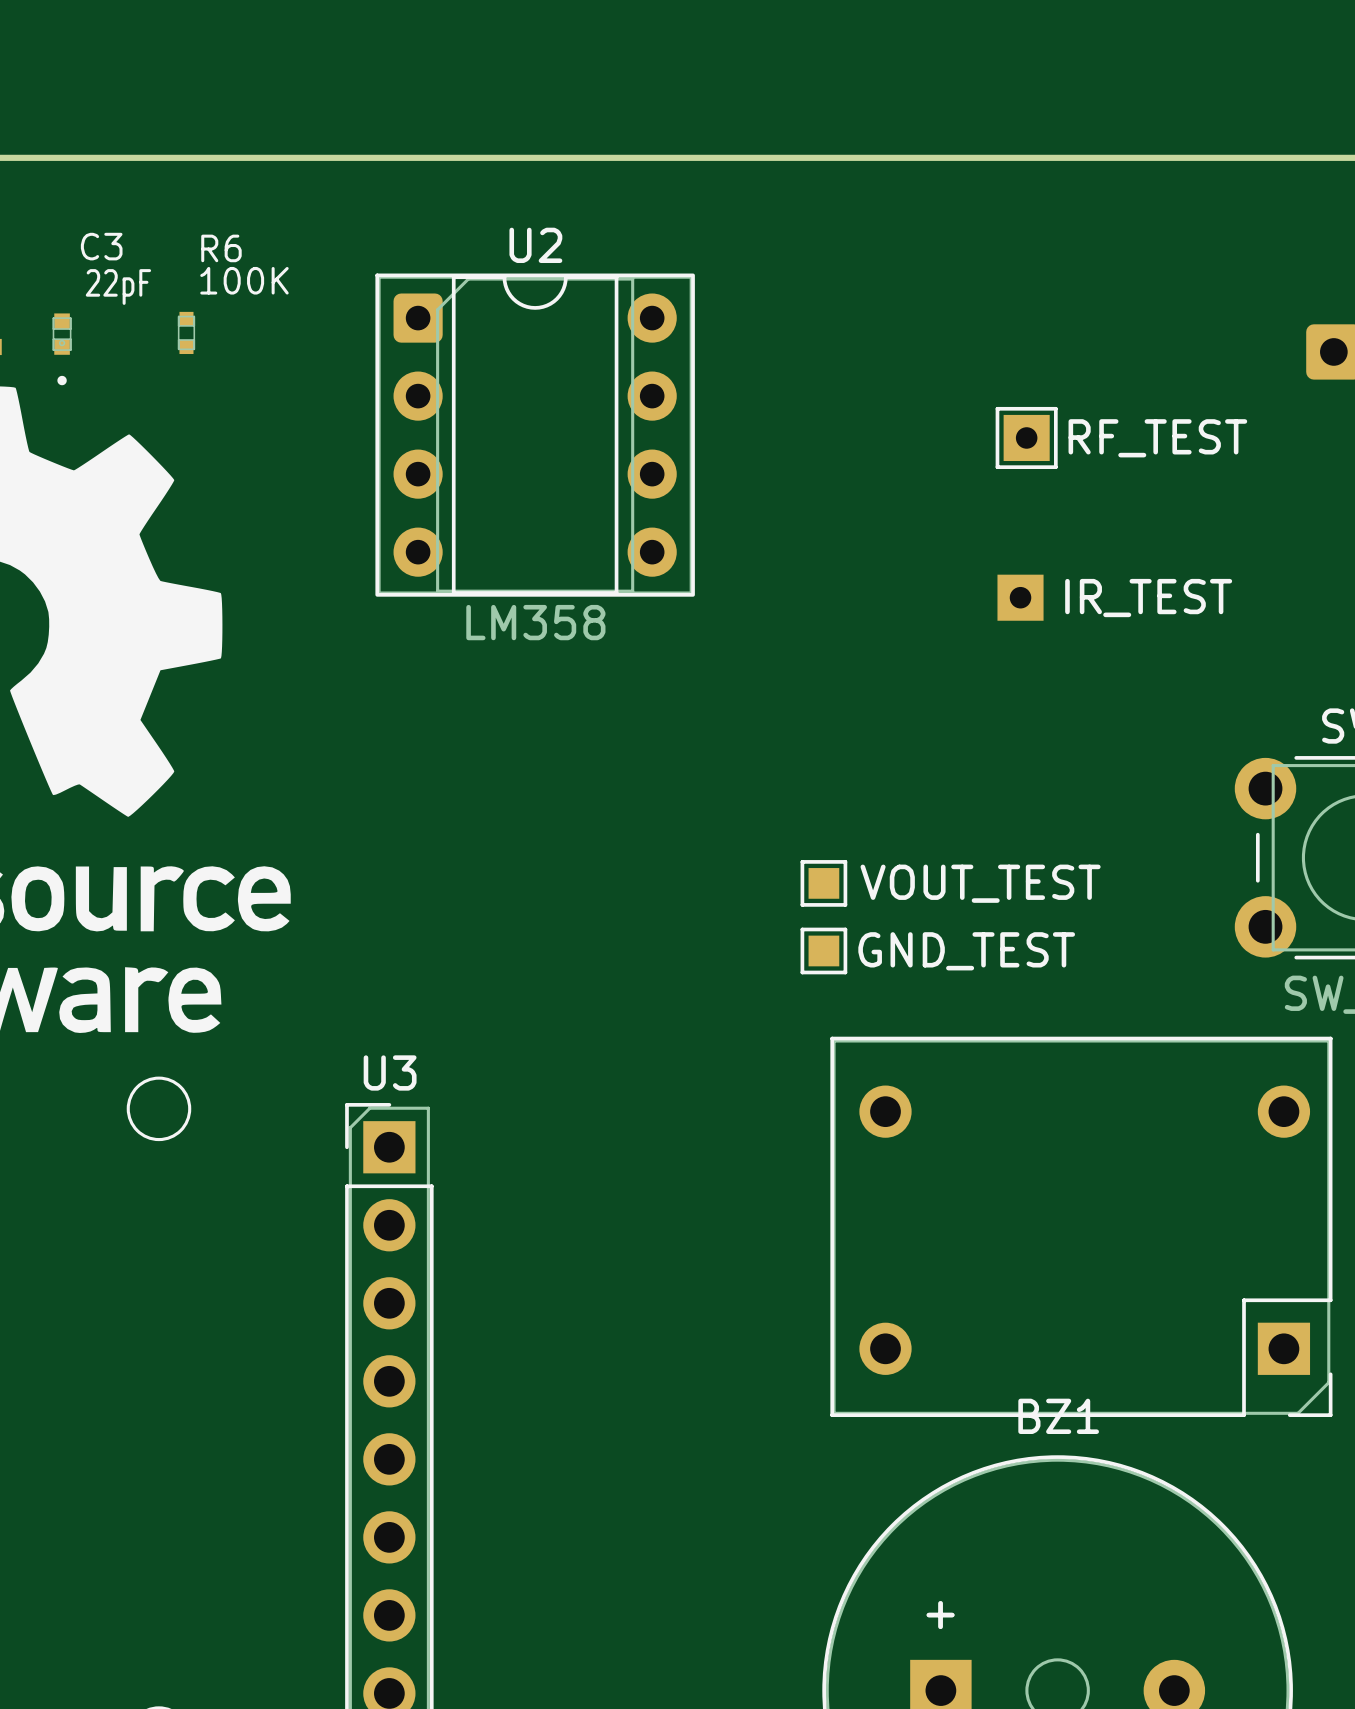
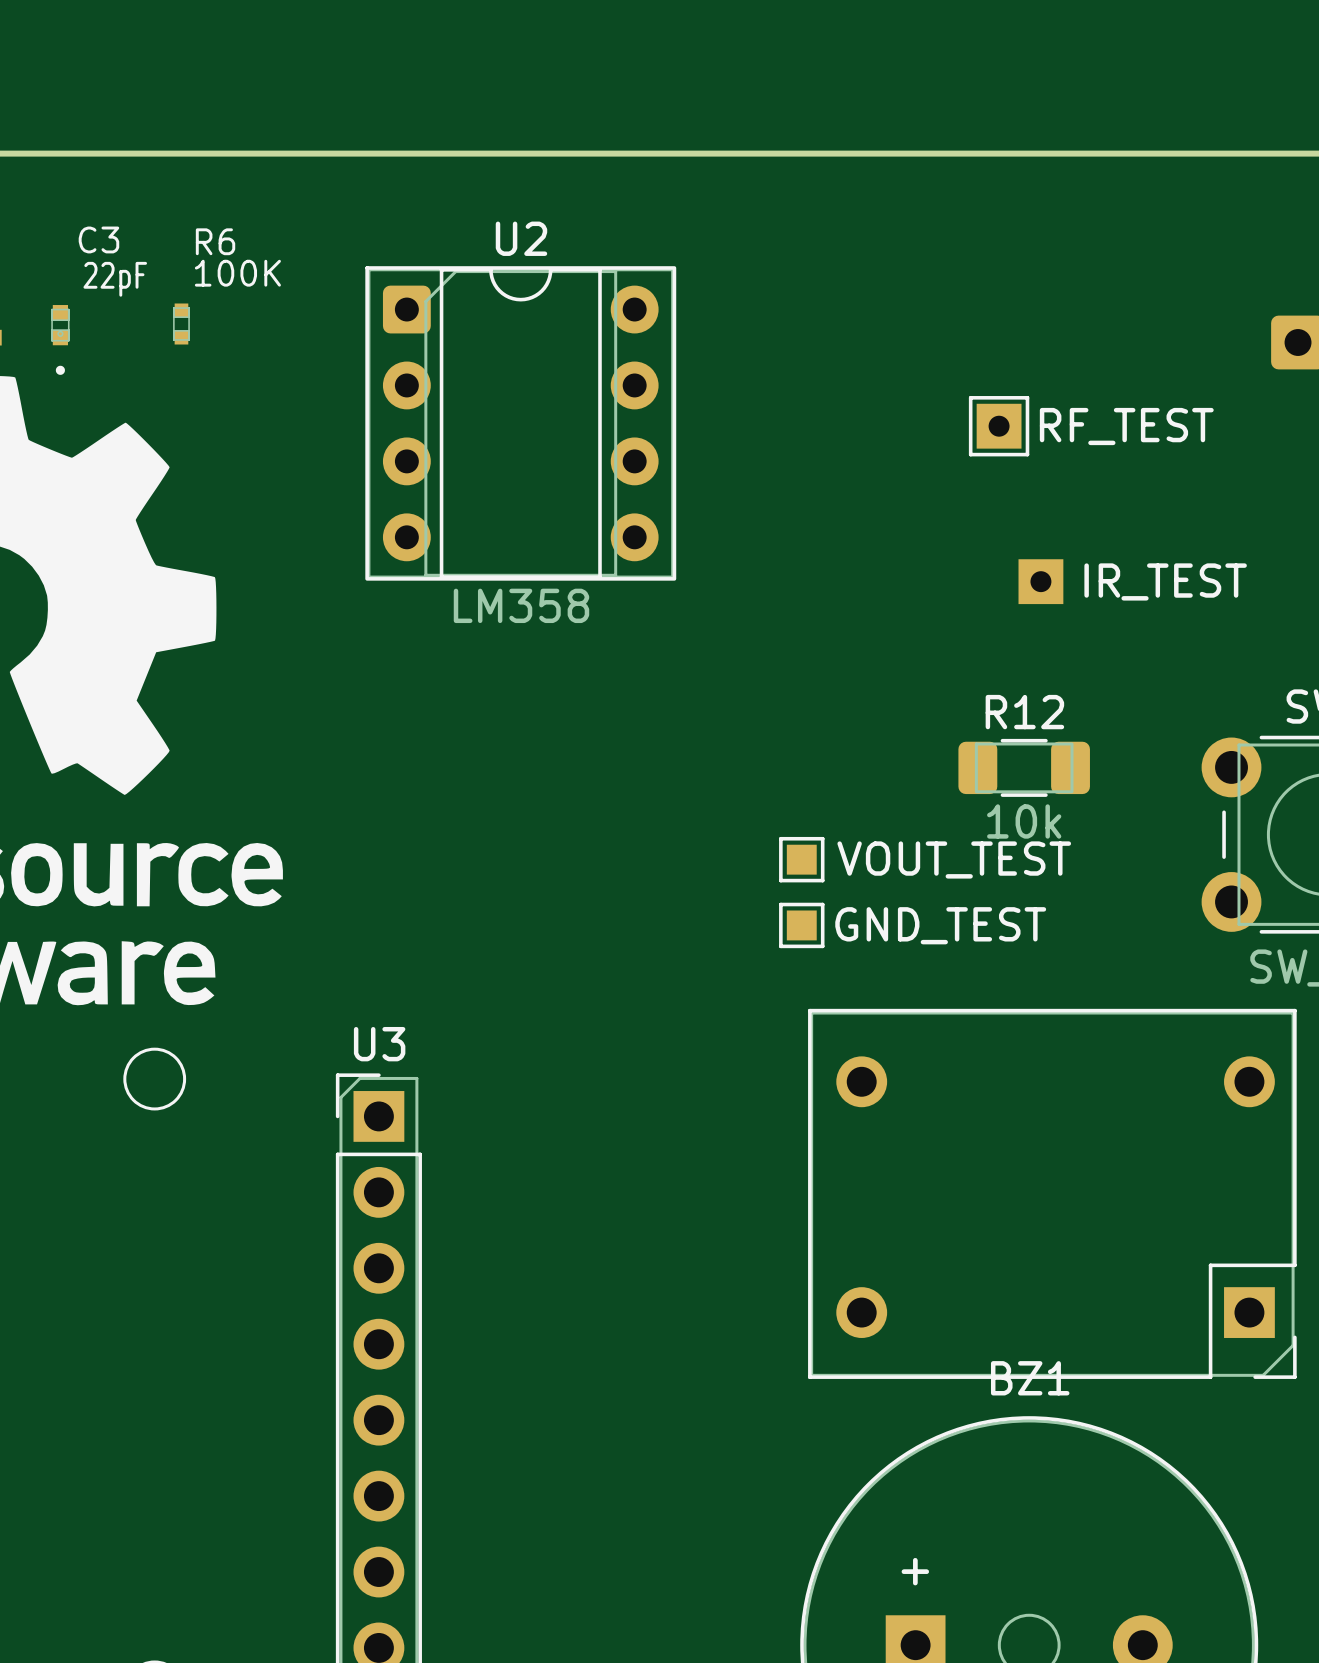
part position: (1020, 597) -> (1040, 581)
R12: none -> 10k (1024, 767)

